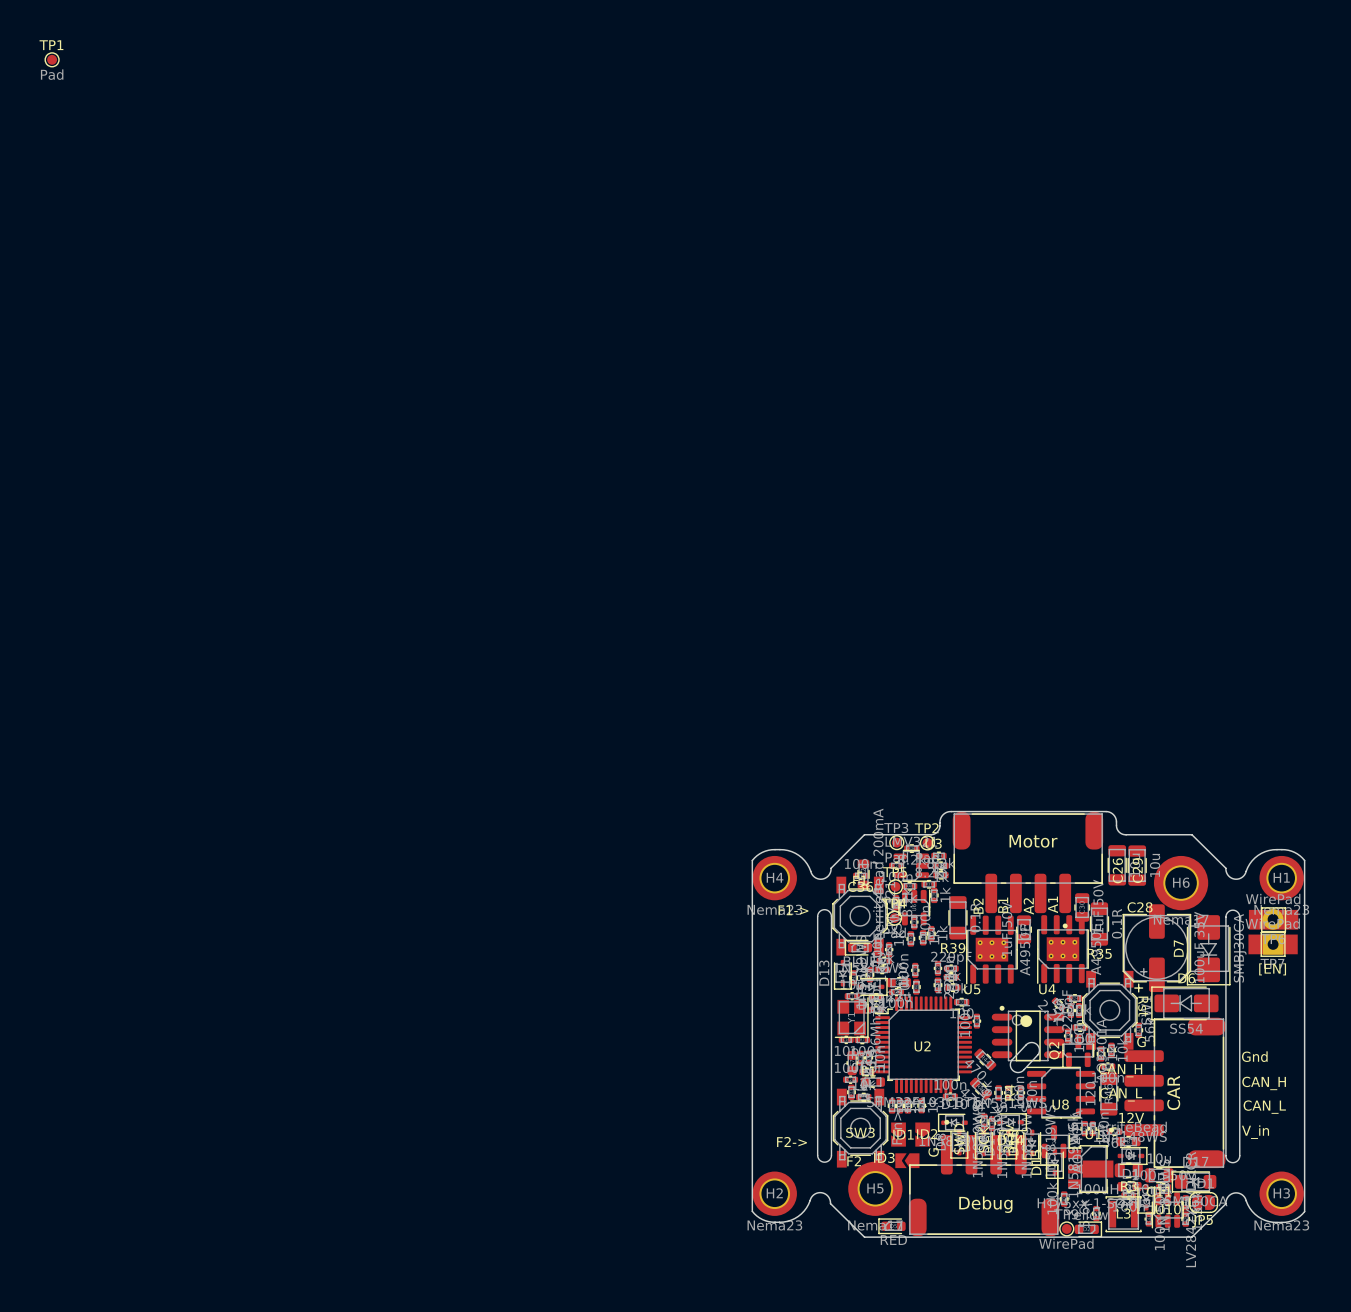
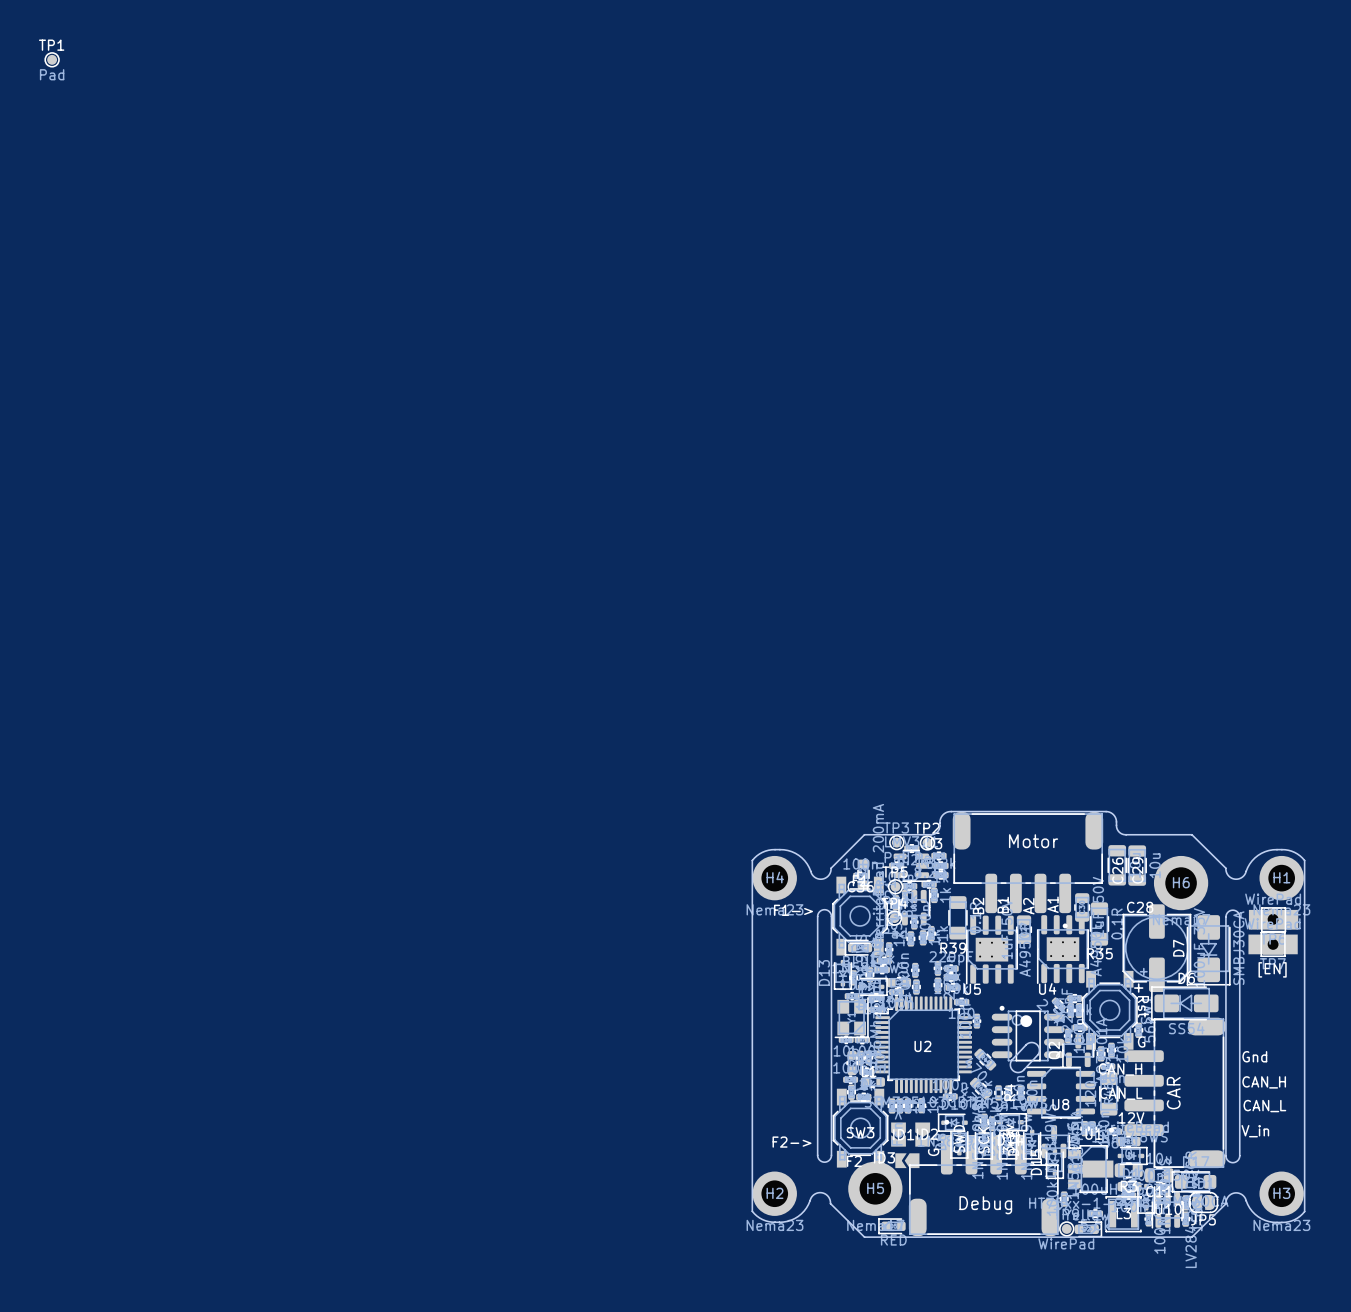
part rotation: 0° (1096, 1213) -> 90° clockwise (1095, 1213)

